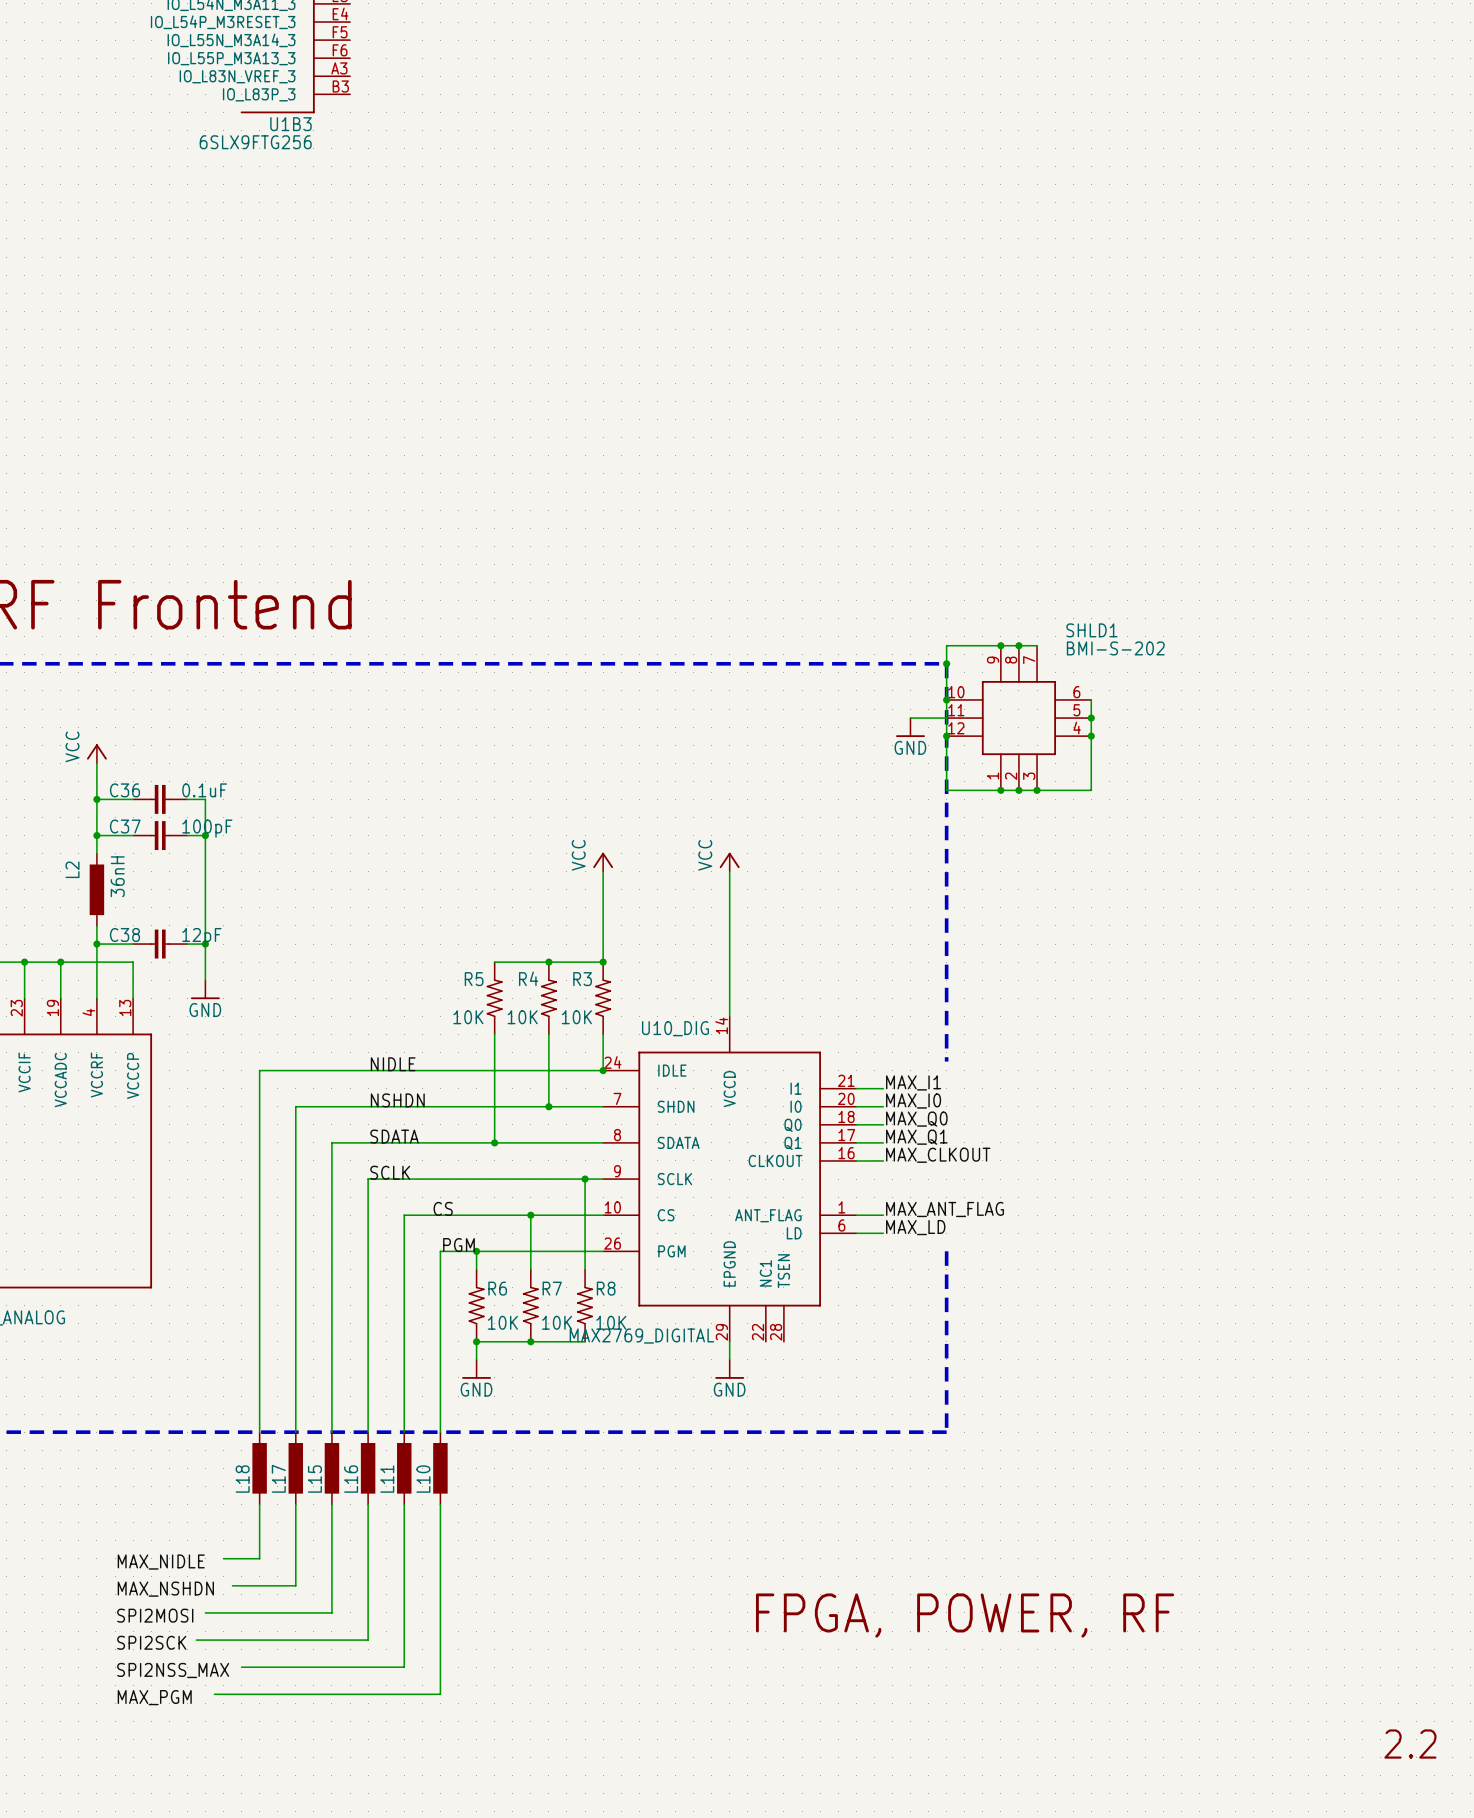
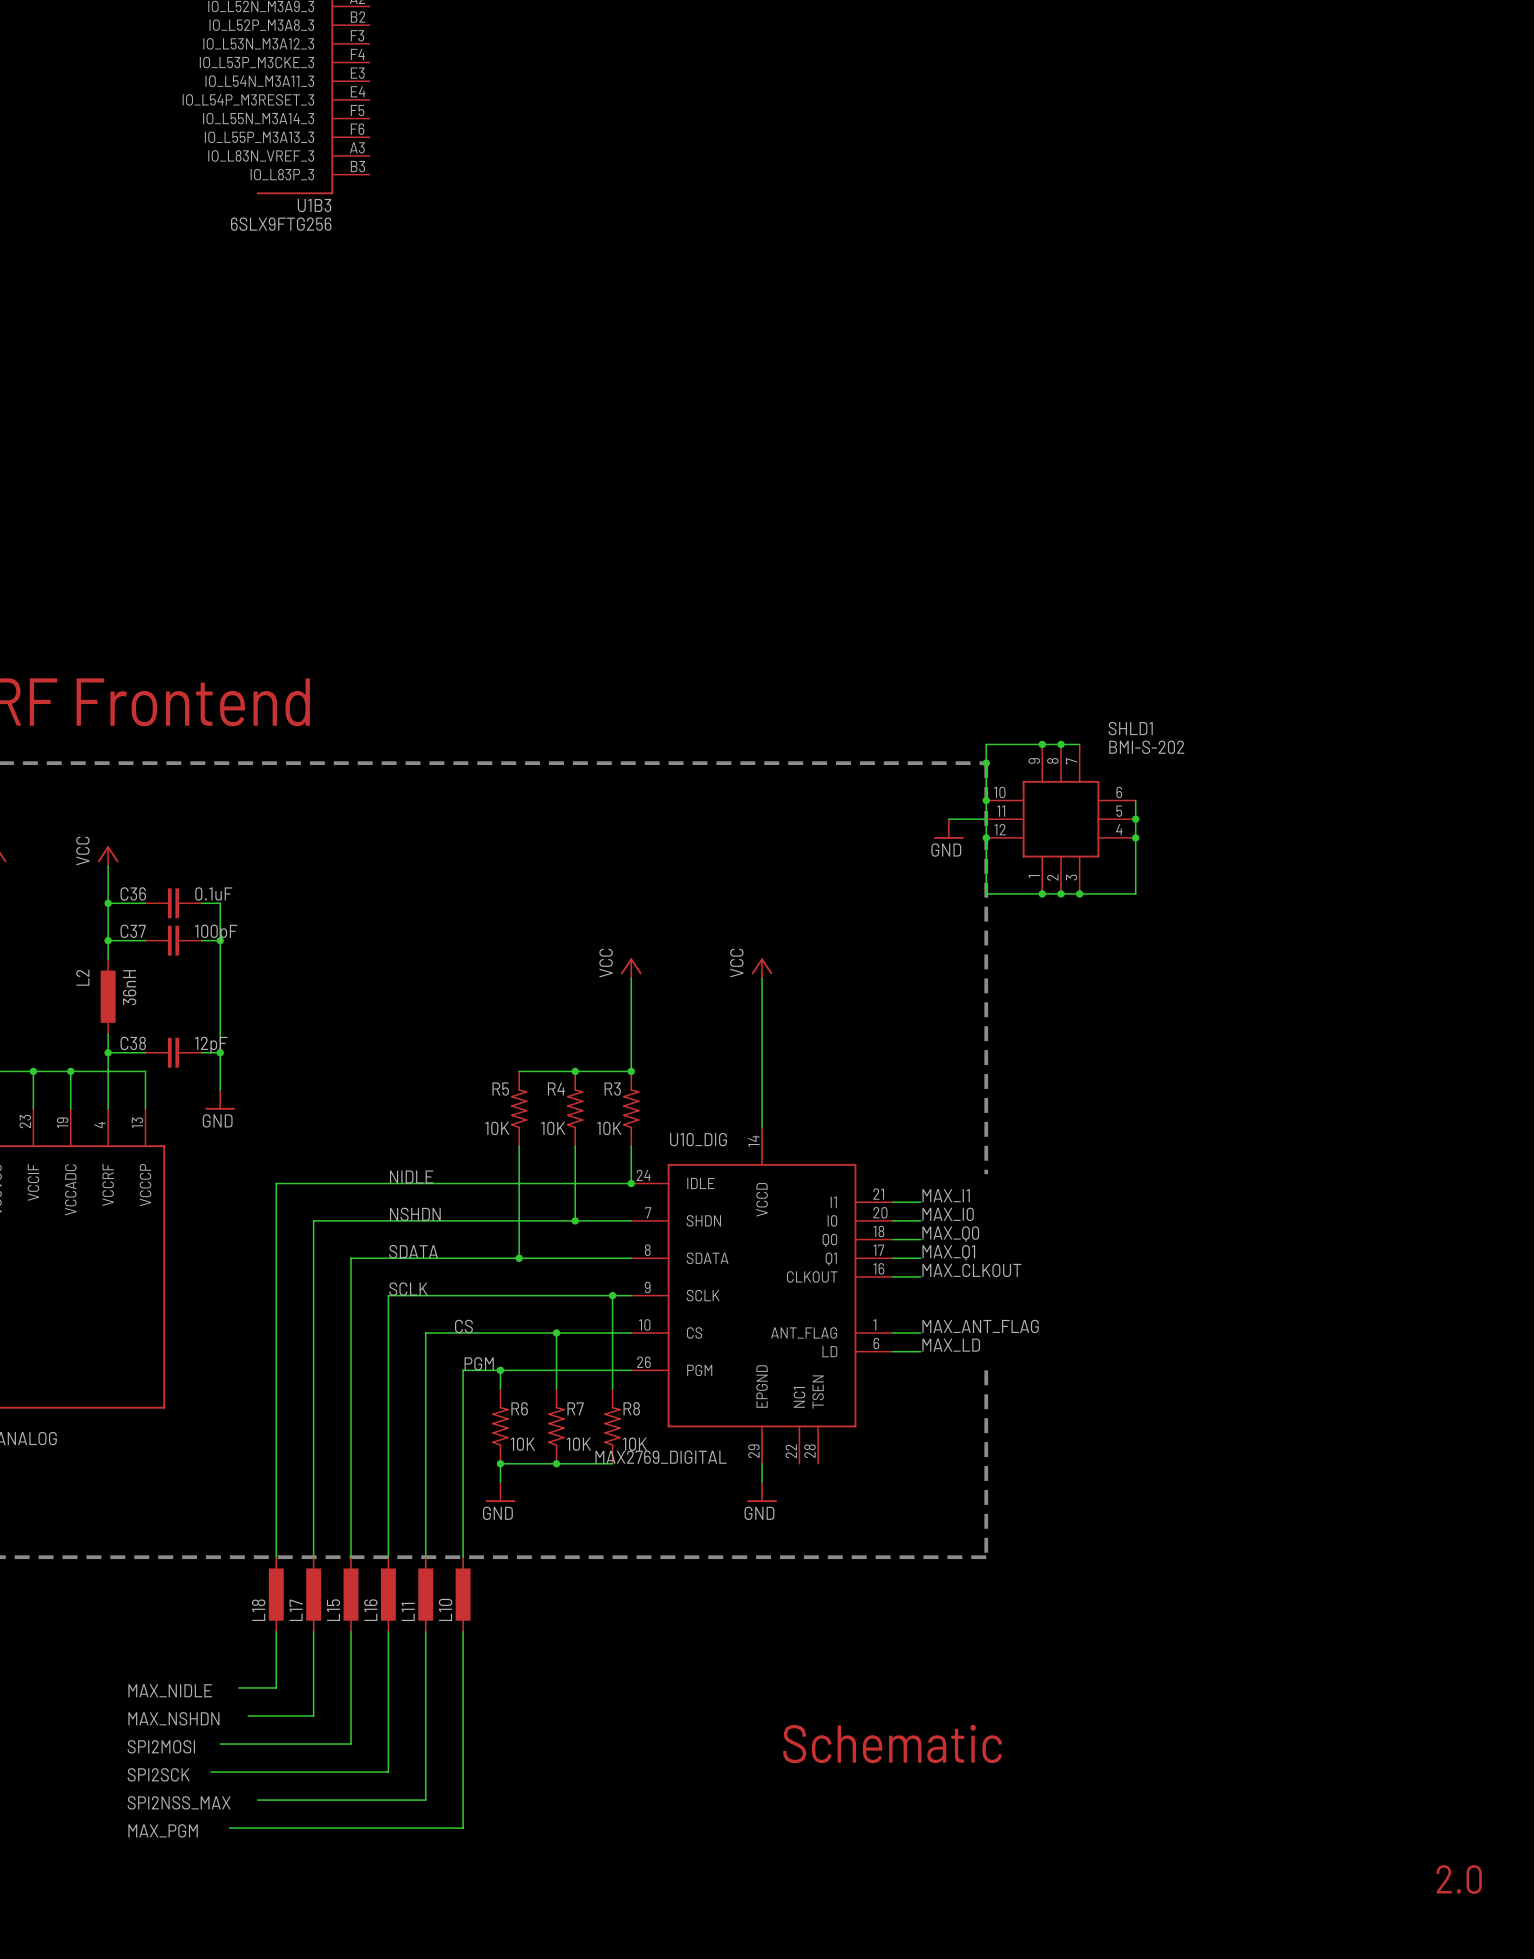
text: FPGA, POWER, RF (965, 1615) -> Schematic (892, 1744)
text: 2.2 (1410, 1744) -> 2.0 (1459, 1879)

